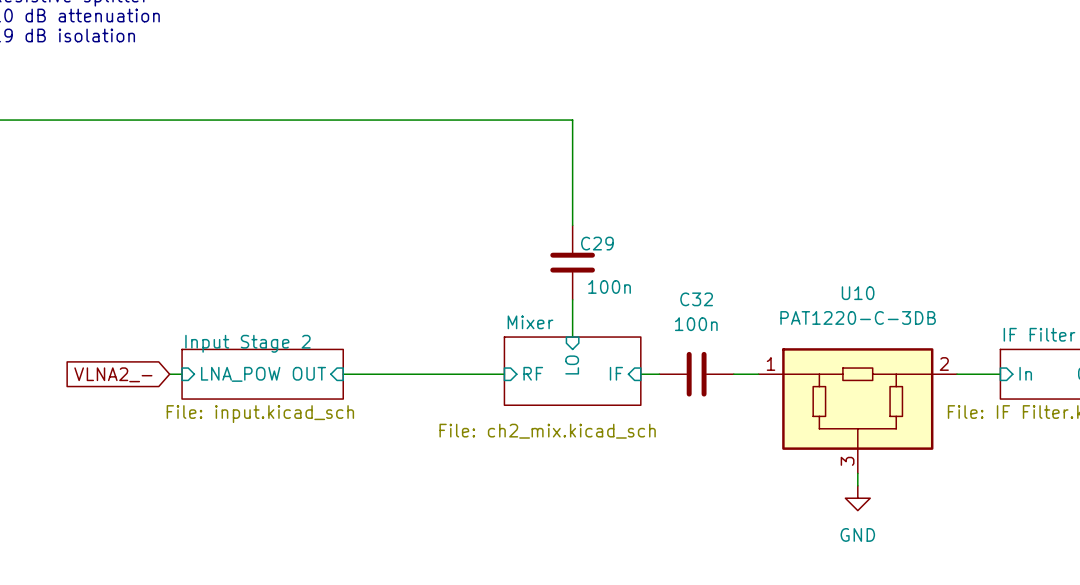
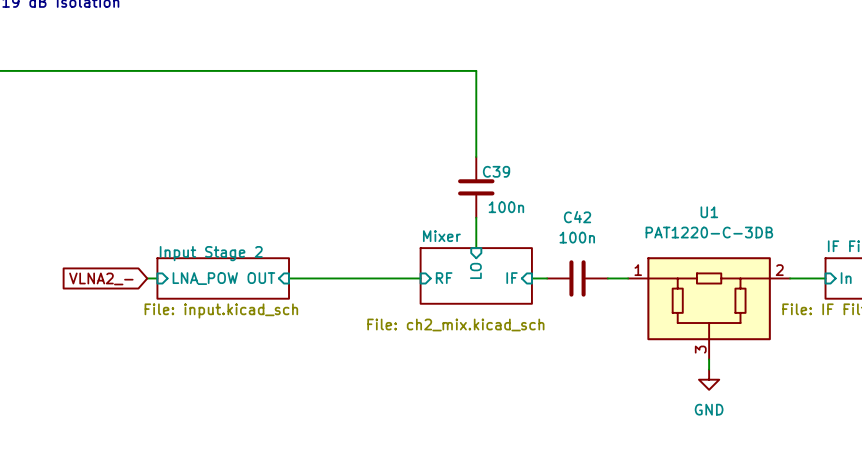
C29 name: C29 (597, 243) -> C39 (496, 171)
U10 name: U10 (858, 293) -> U1 (709, 212)
C32 name: C32 (696, 299) -> C42 (577, 217)

